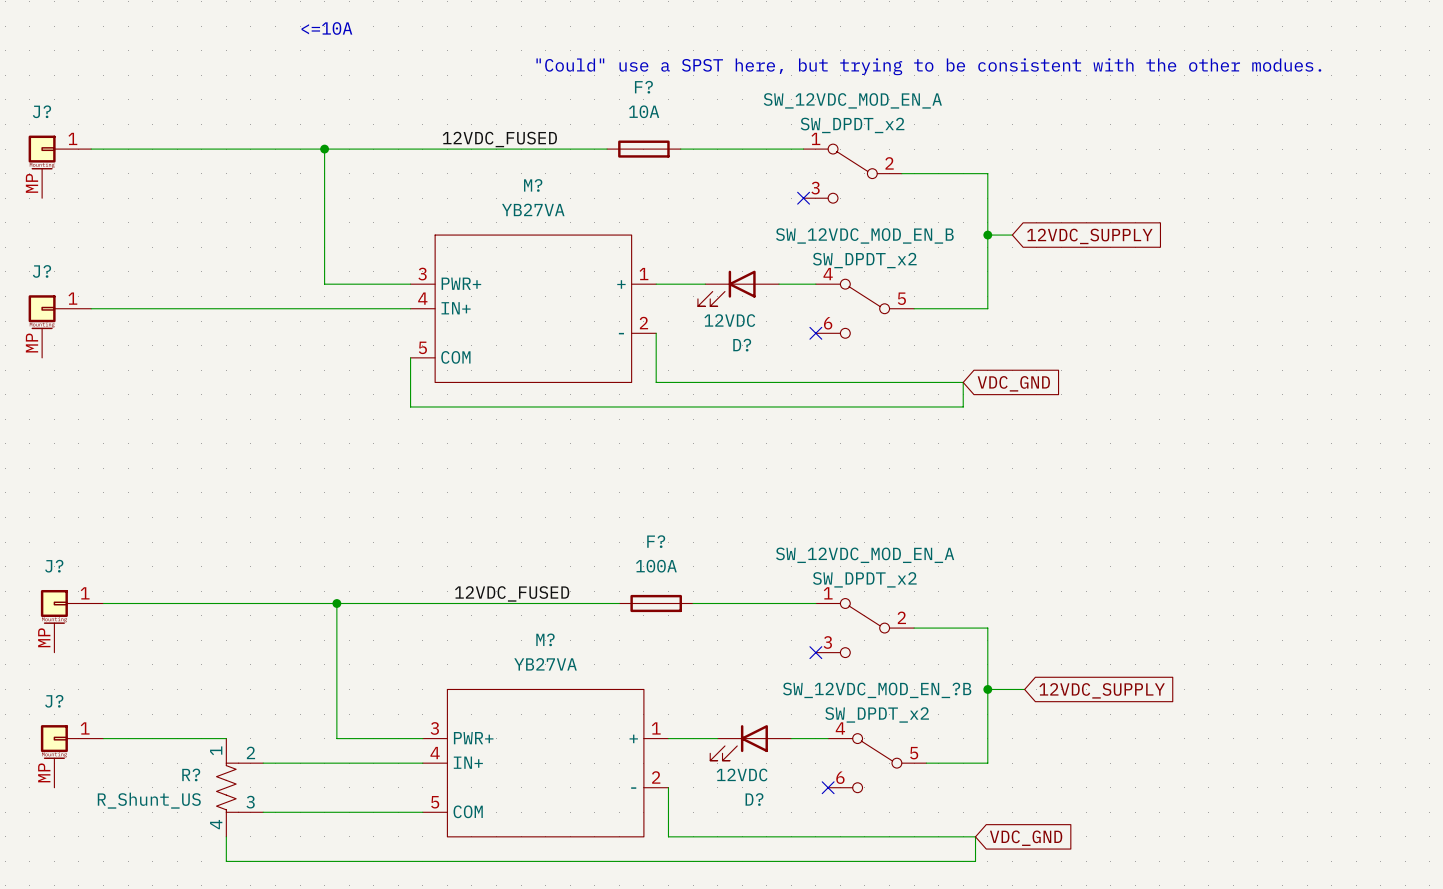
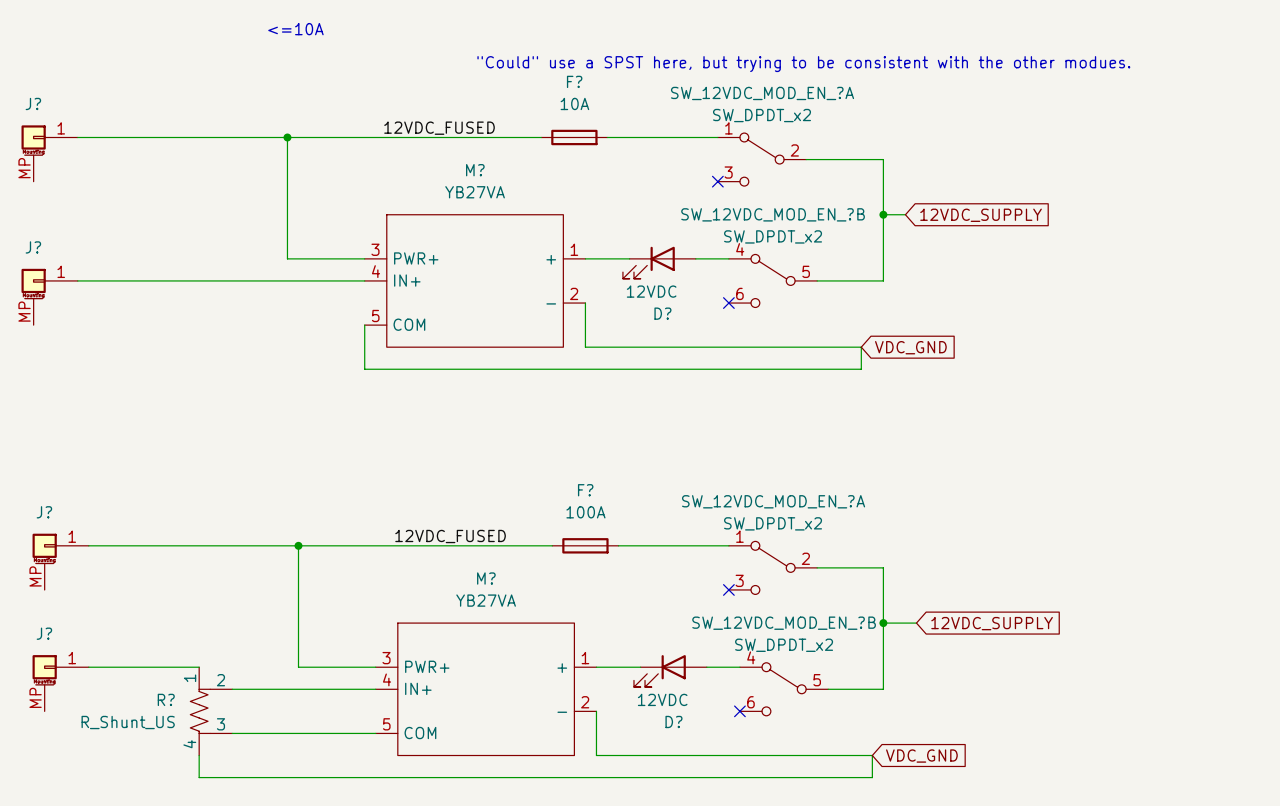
SW_12VDC_MOD_EN_A name: SW_12VDC_MOD_EN_A (852, 100) -> SW_12VDC_MOD_EN_?A (762, 93)
SW_12VDC_MOD_EN_B name: SW_12VDC_MOD_EN_B (864, 235) -> SW_12VDC_MOD_EN_?B (773, 214)
SW_12VDC_MOD_EN_A name: SW_12VDC_MOD_EN_A (865, 555) -> SW_12VDC_MOD_EN_?A (773, 501)

